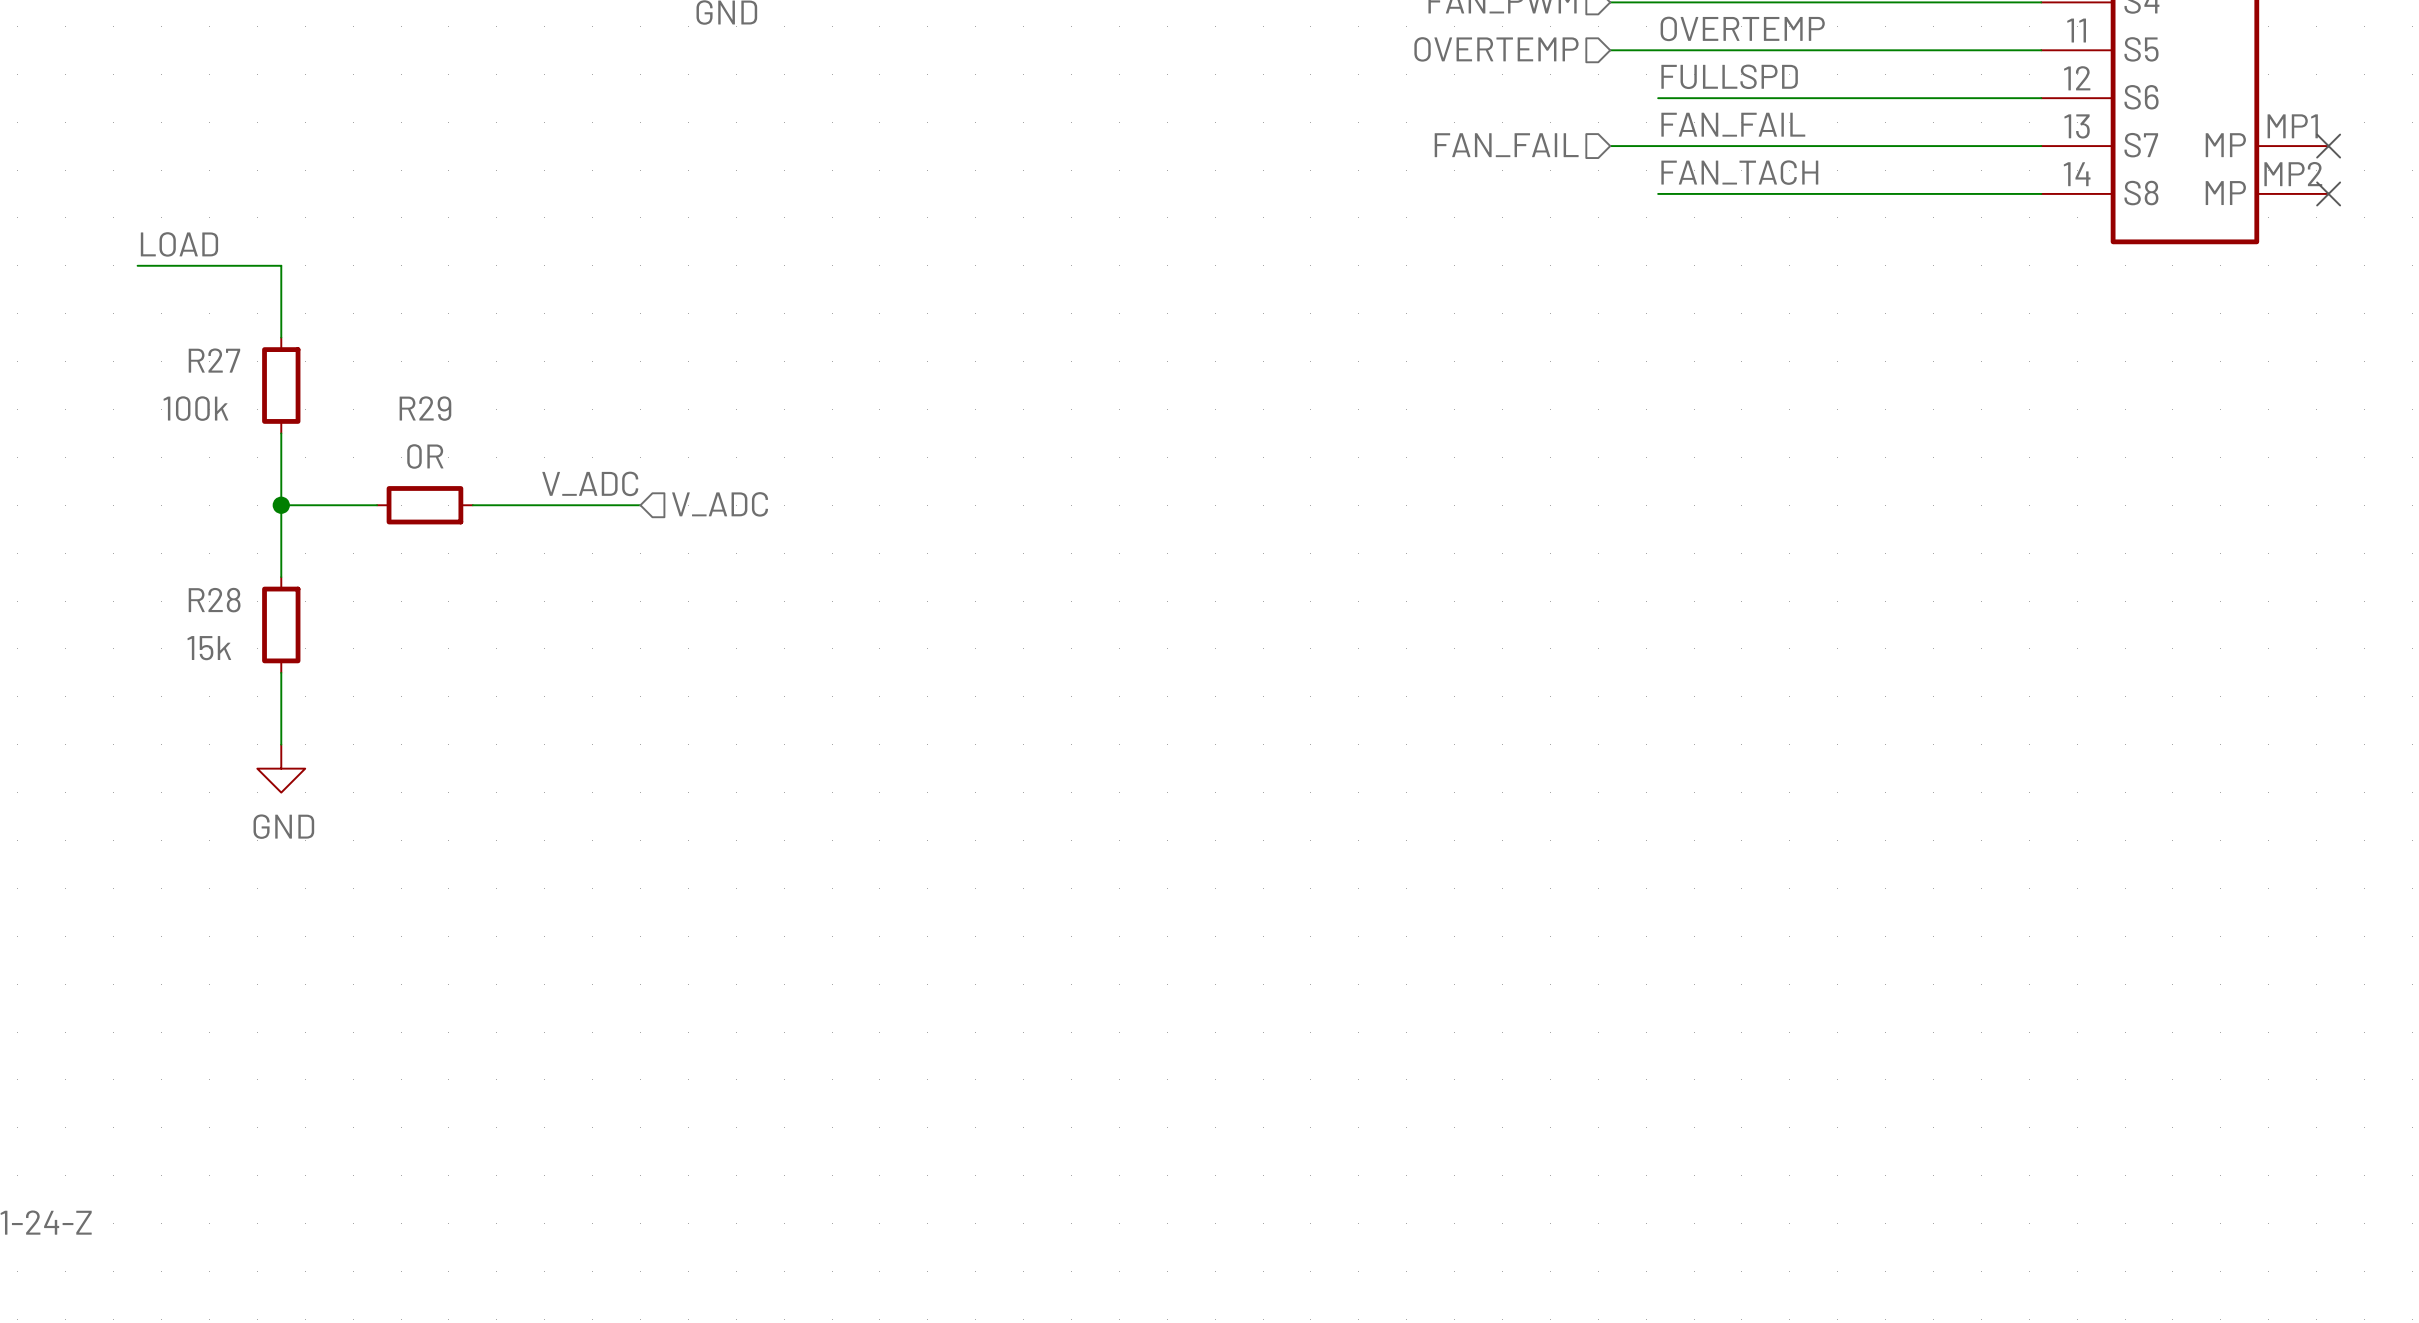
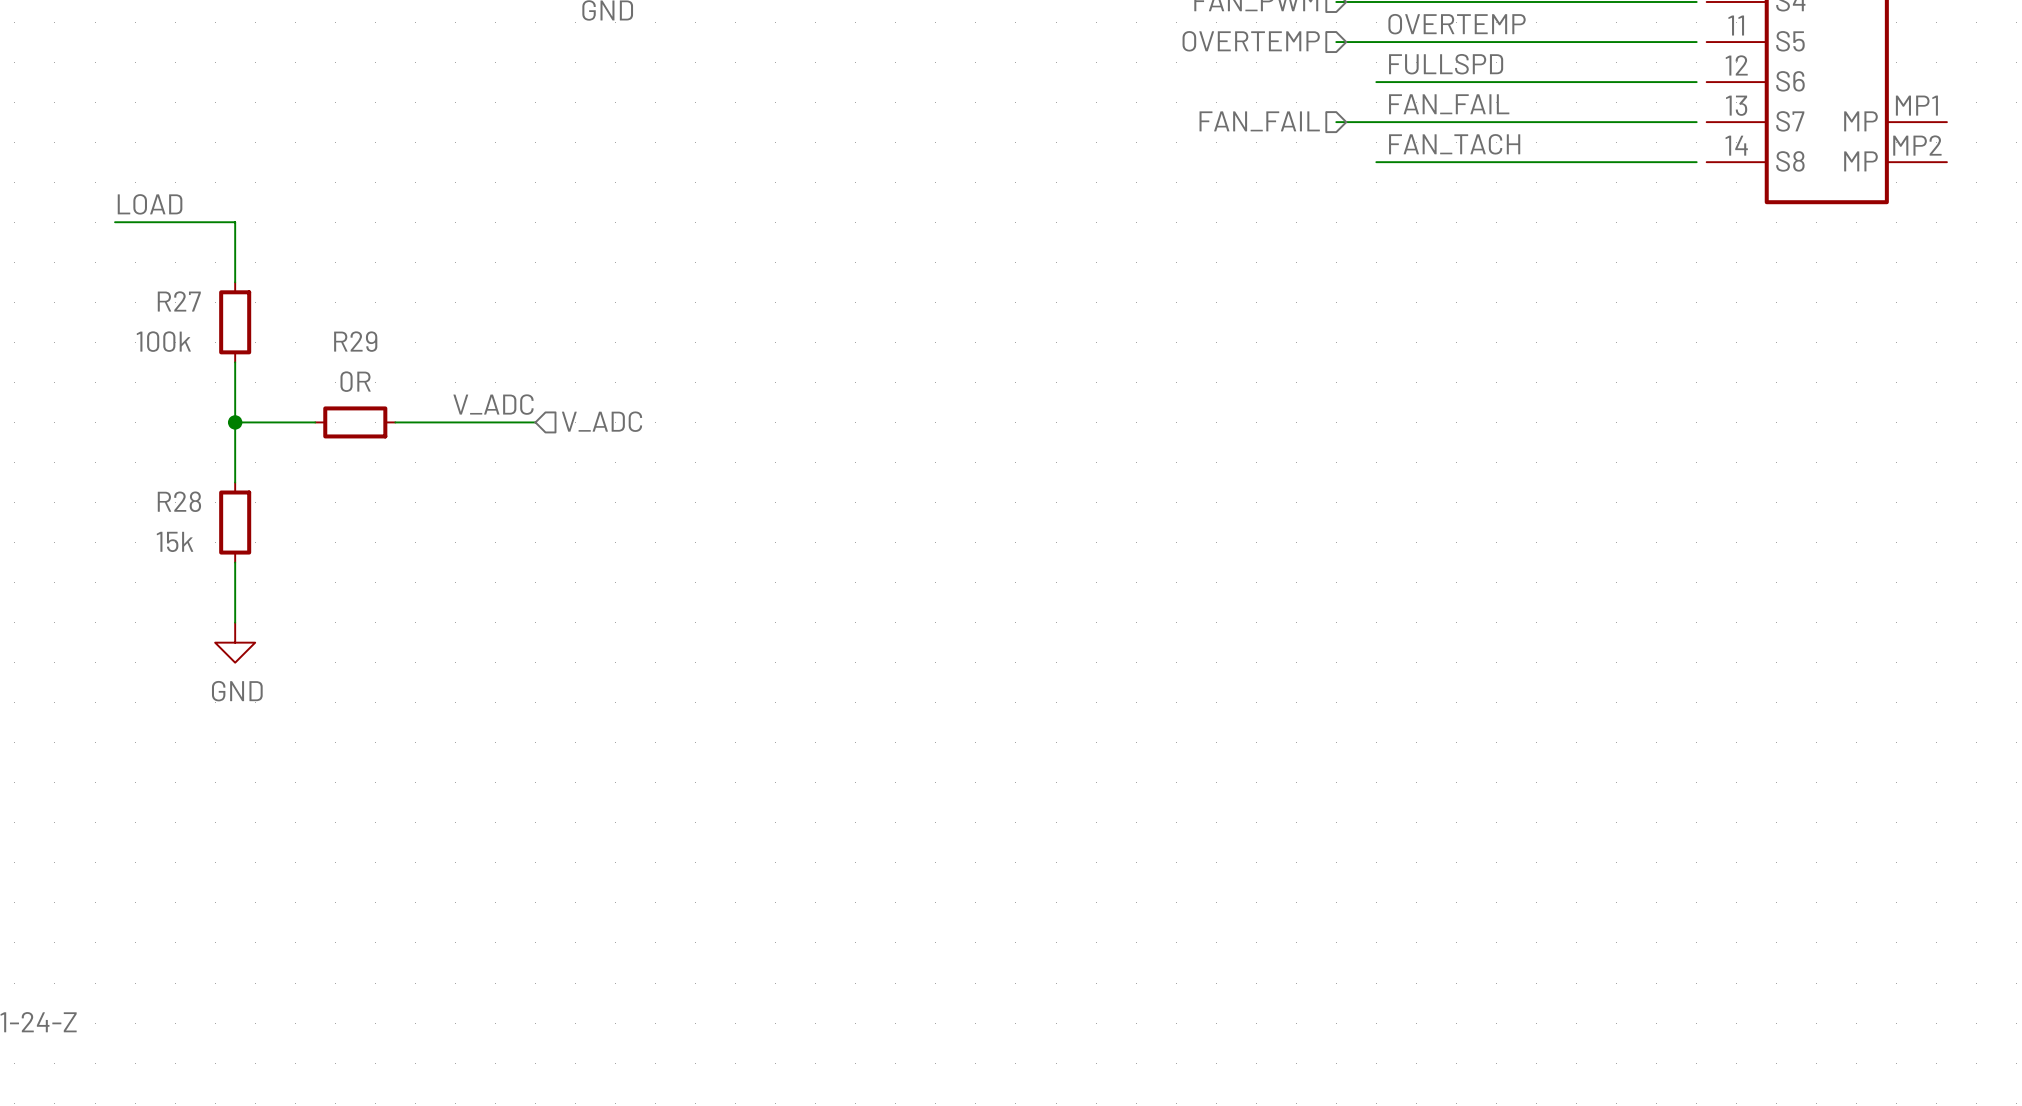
wire: (2029, 2) (2041, 2) -> (1336, 2) (1346, 2)
wire: (2029, 50) (2041, 50) -> (1336, 42) (1346, 42)
wire: (2029, 98) (2041, 98) -> (1376, 82) (1386, 82)
wire: (2029, 146) (2041, 146) -> (1336, 122) (1346, 122)
no-connect mark: (2328, 146) -> none
wire: (2029, 193) (2041, 193) -> (1376, 162) (1386, 162)
no-connect mark: (2328, 193) -> none

